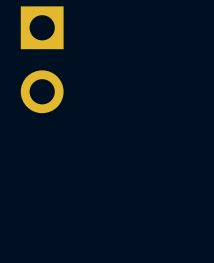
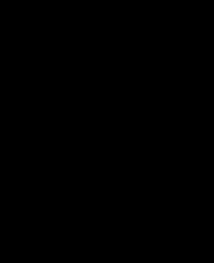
part: (42, 59) -> none

